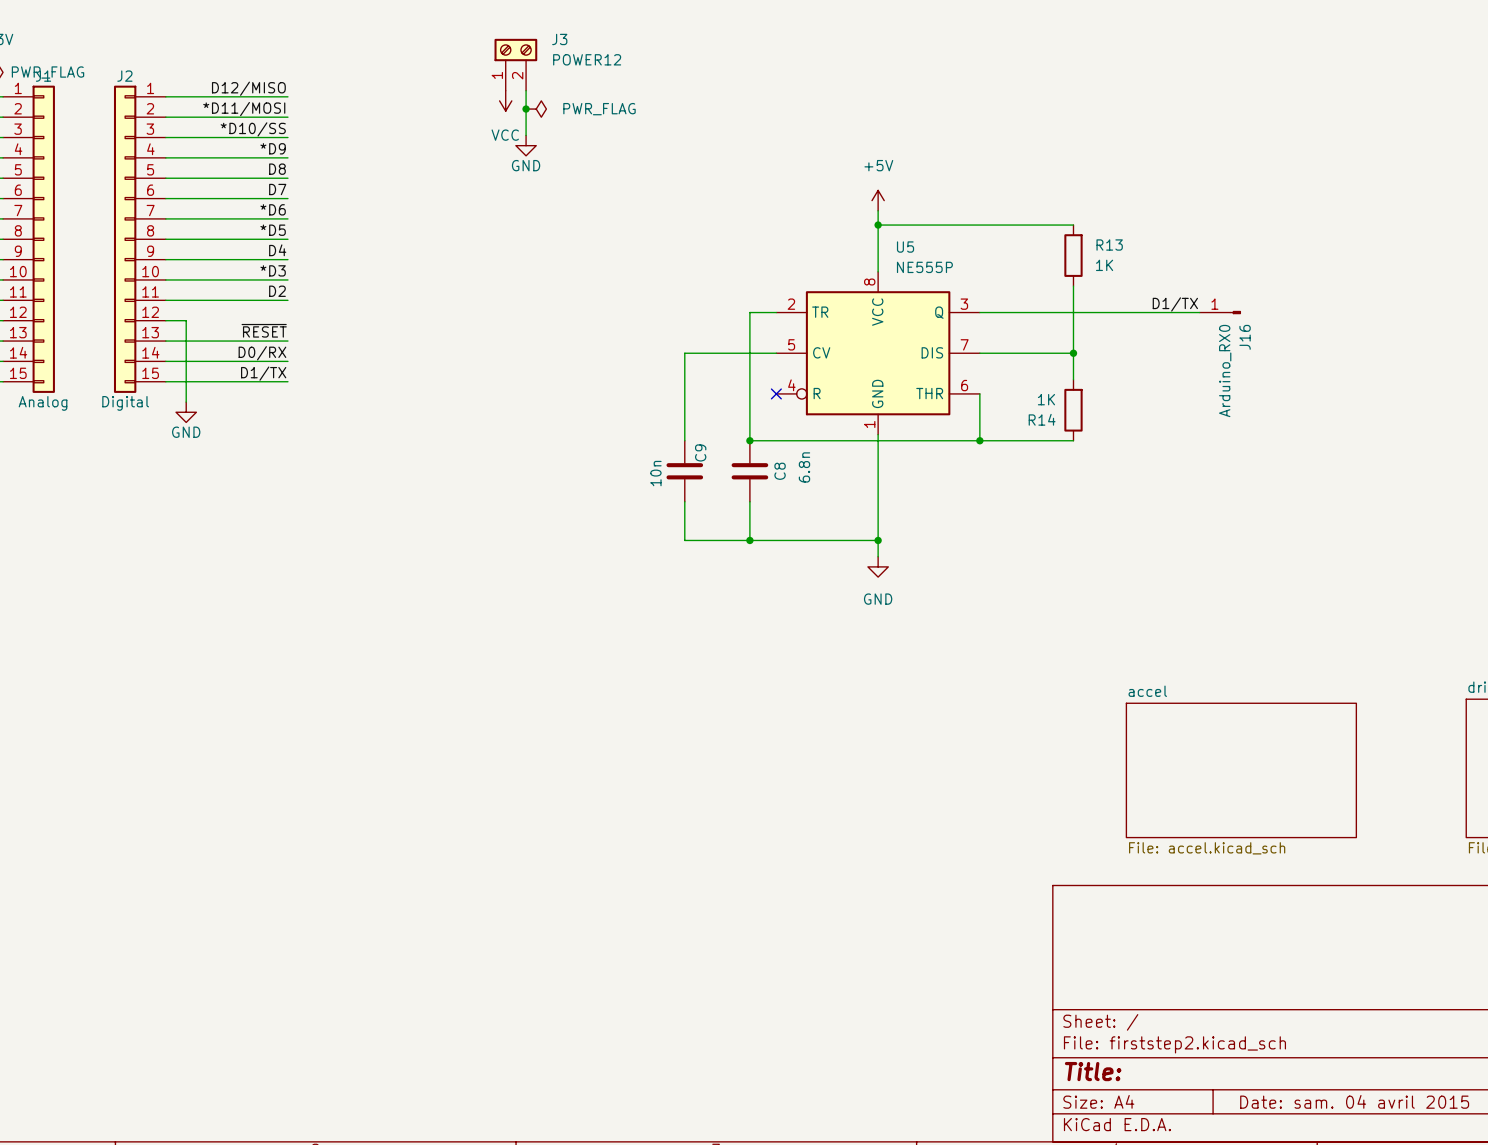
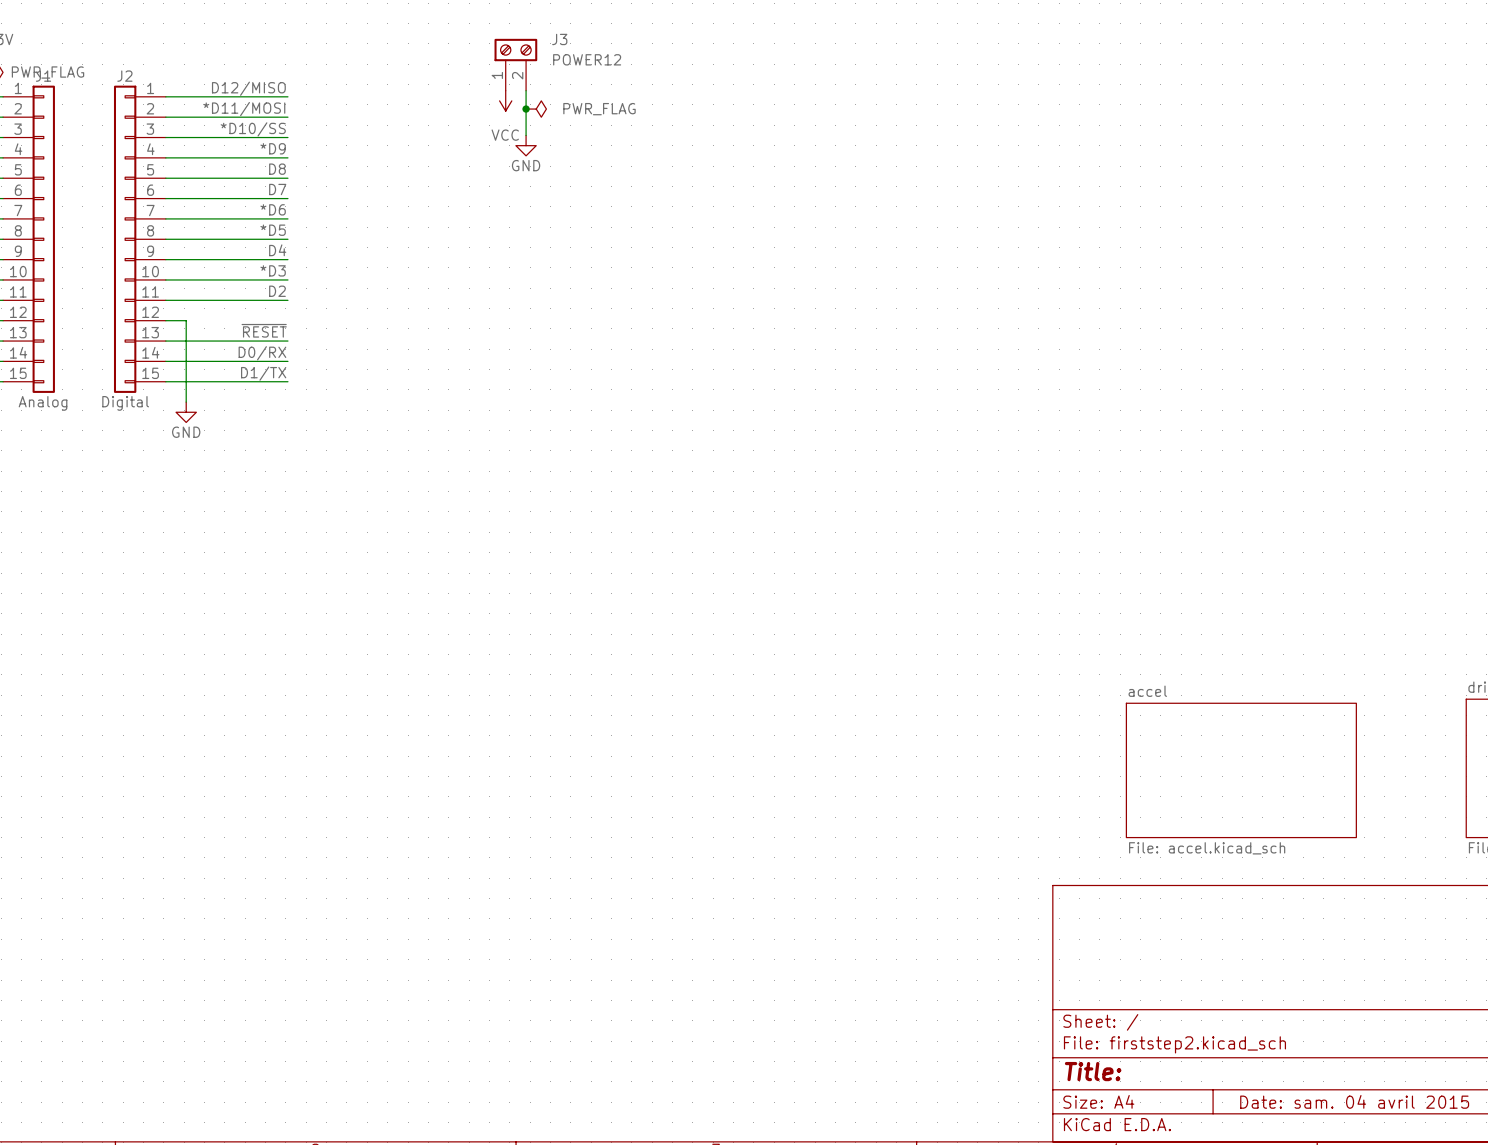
power symbol: +5V (878, 200) -> none
wire: (878, 210) (878, 271) -> none
wire: (878, 225) (1073, 225) -> none
junction: (878, 225) -> none
R13: 1K (1073, 255) -> none
wire: (1073, 286) (1073, 379) -> none
label: D1/TX (1175, 304) -> none
wire: (776, 312) (749, 312) (749, 440) (1073, 440) -> none
wire: (979, 312) (1199, 312) -> none
J16: Arduino_RX0 (1220, 312) -> none
wire: (776, 353) (684, 353) (684, 440) -> none
U5: NE555P (878, 353) -> none
wire: (979, 353) (1073, 353) -> none
junction: (1073, 353) -> none
no-connect mark: (776, 393) -> none
wire: (979, 393) (979, 440) -> none
R14: 1K (1073, 410) -> none
wire: (878, 434) (878, 556) -> none
junction: (749, 440) -> none
junction: (979, 440) -> none
C9: 10n (684, 471) -> none
C8: 6.8n (749, 471) -> none
wire: (684, 501) (684, 540) (878, 540) -> none
wire: (749, 501) (749, 540) -> none
junction: (749, 540) -> none
junction: (878, 540) -> none
power symbol: GND (878, 566) -> none

